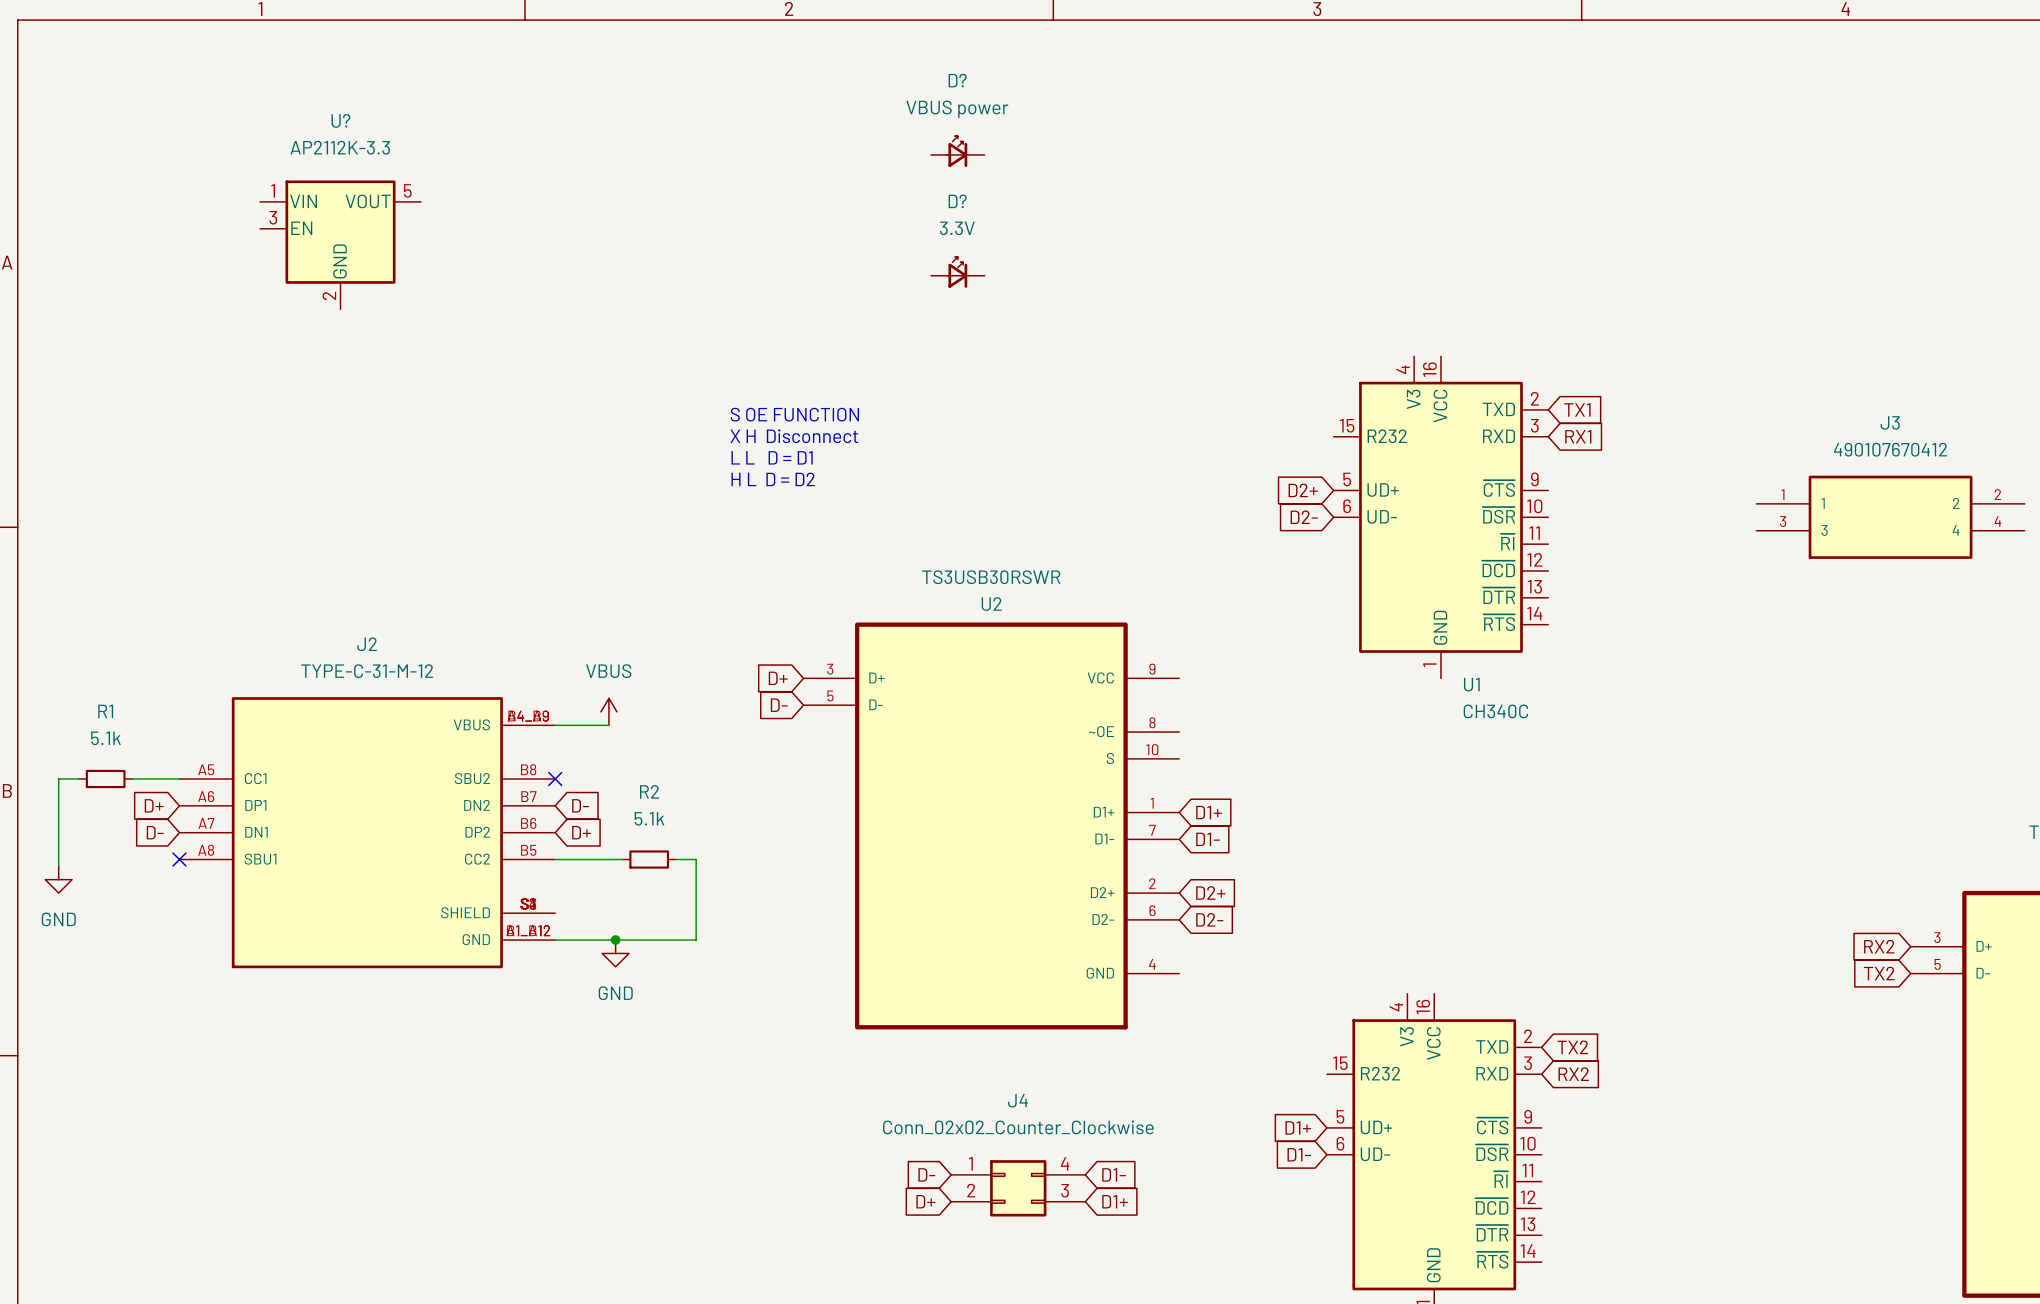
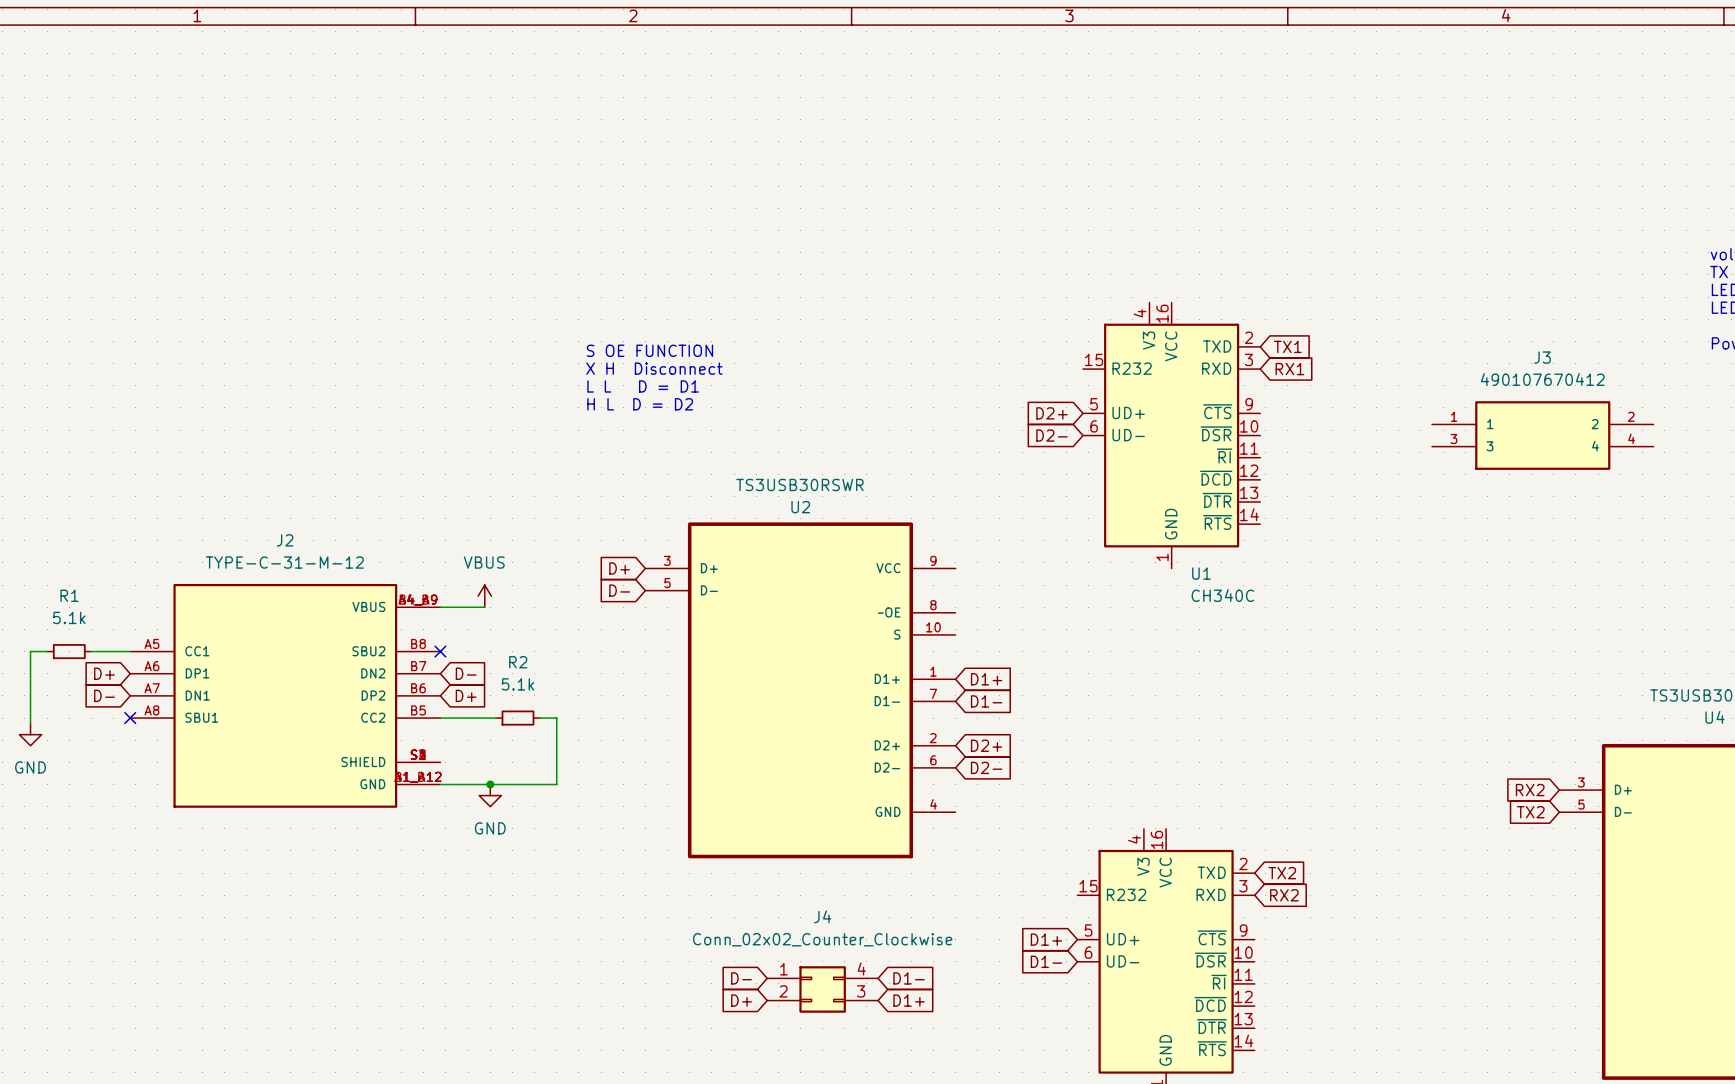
D?: VBUS power (957, 151) -> none
U?: AP2112K-3.3 (340, 244) -> none
D?: 3.3V (957, 272) -> none

